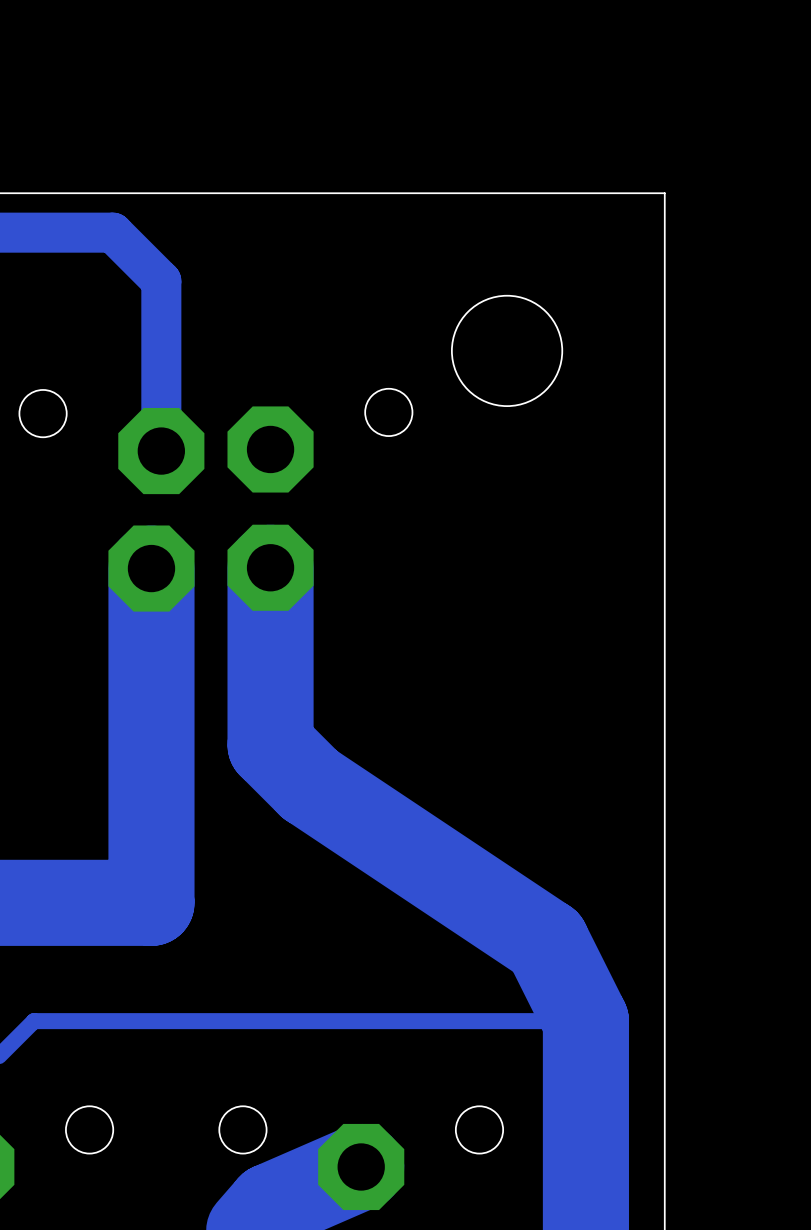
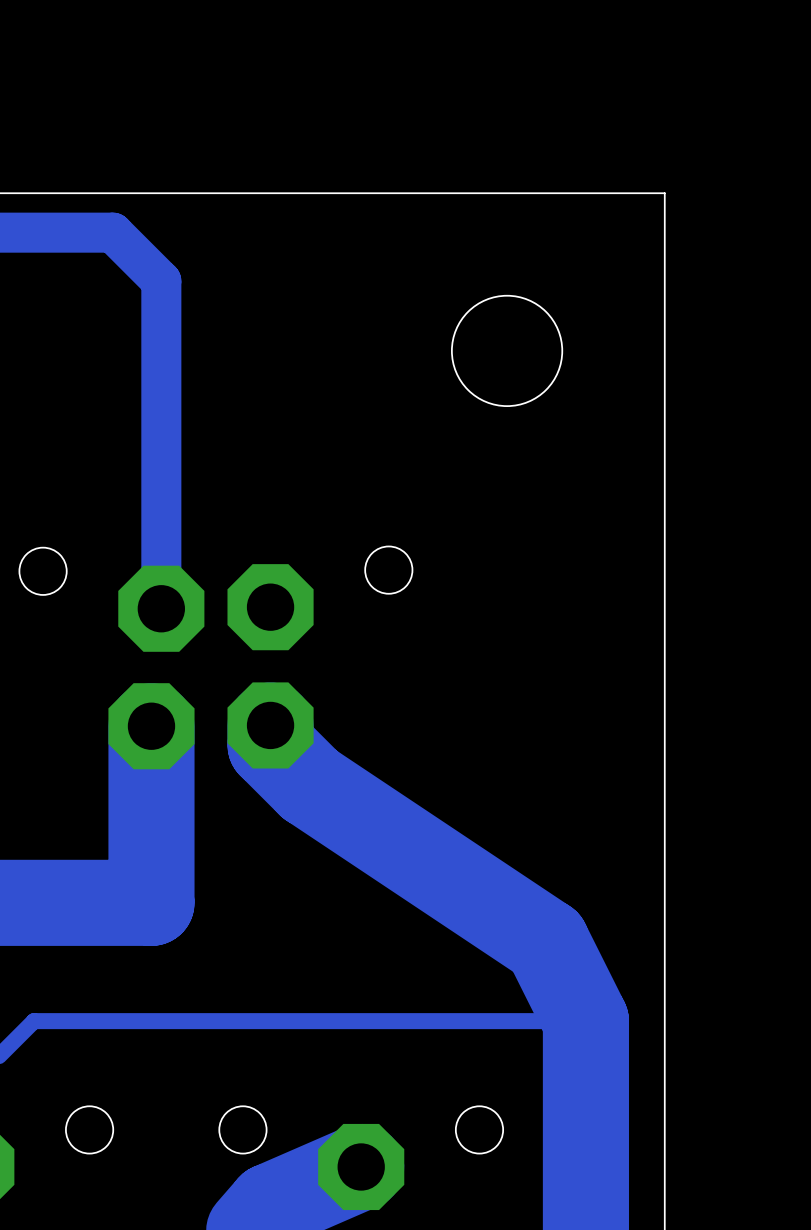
part position: (215, 500) -> (215, 657)
bottom track: (270, 567) (270, 725) -> none
bottom track: (151, 568) (151, 726) -> (161, 451) (161, 608)

